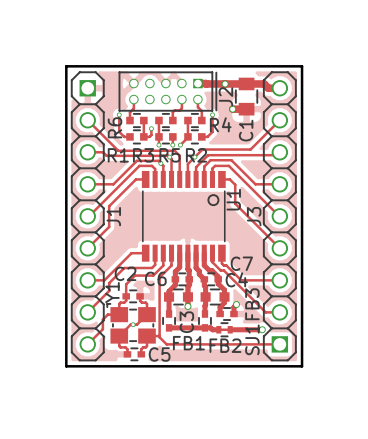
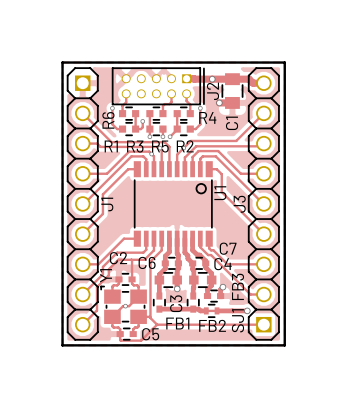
track: (135, 275) (126, 284) (126, 296) -> (127, 259) (118, 259) (108, 269) (108, 275) (96, 287) (96, 301)
track: none -> (131, 259) (132, 279)
track: (119, 314) (107, 314) (102, 319) -> none
track: none -> (157, 324) (141, 340) (120, 340) (120, 334)

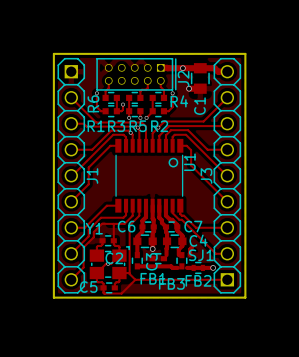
C7 name position: C7 (228, 248) -> C7 (193, 226)
C2 name position: C2 (118, 258) -> C2 (114, 258)
C4 name position: C4 (223, 264) -> C4 (198, 240)
Y1 footprint: [100, 285, 147, 324] -> [89, 246, 130, 280]
FB3 name rotation: 0° (238, 286) -> 90° clockwise (171, 283)
FB3 name position: FB3 (238, 286) -> FB3 (171, 283)
via: (222, 287) -> none
FB3 position: (214, 296) -> (158, 258)
FB2 position: (193, 302) -> (181, 260)
SJ1 position: (211, 310) -> (198, 267)
SJ1 name rotation: 0° (237, 320) -> 90° clockwise (201, 255)
C5 name position: C5 (150, 334) -> C5 (88, 286)

